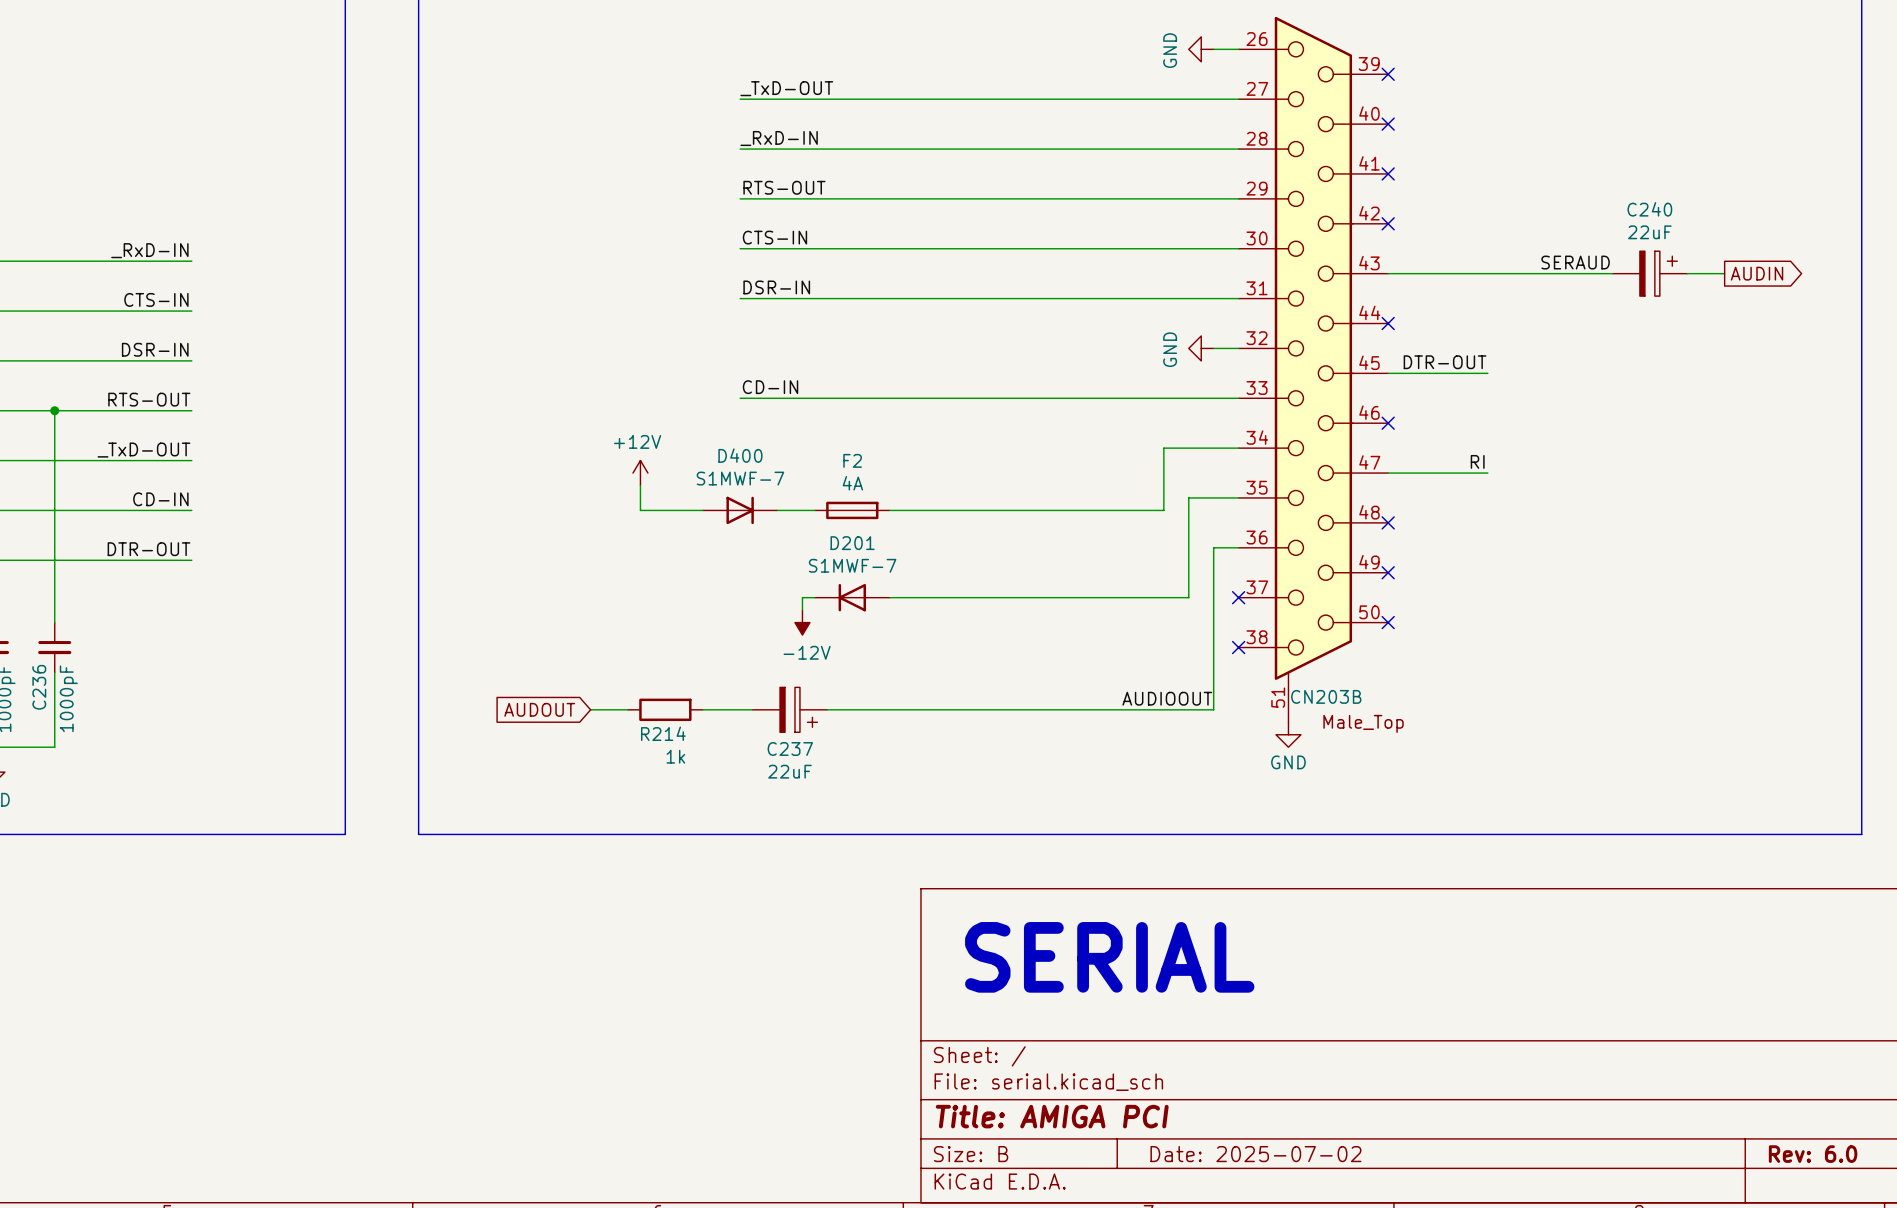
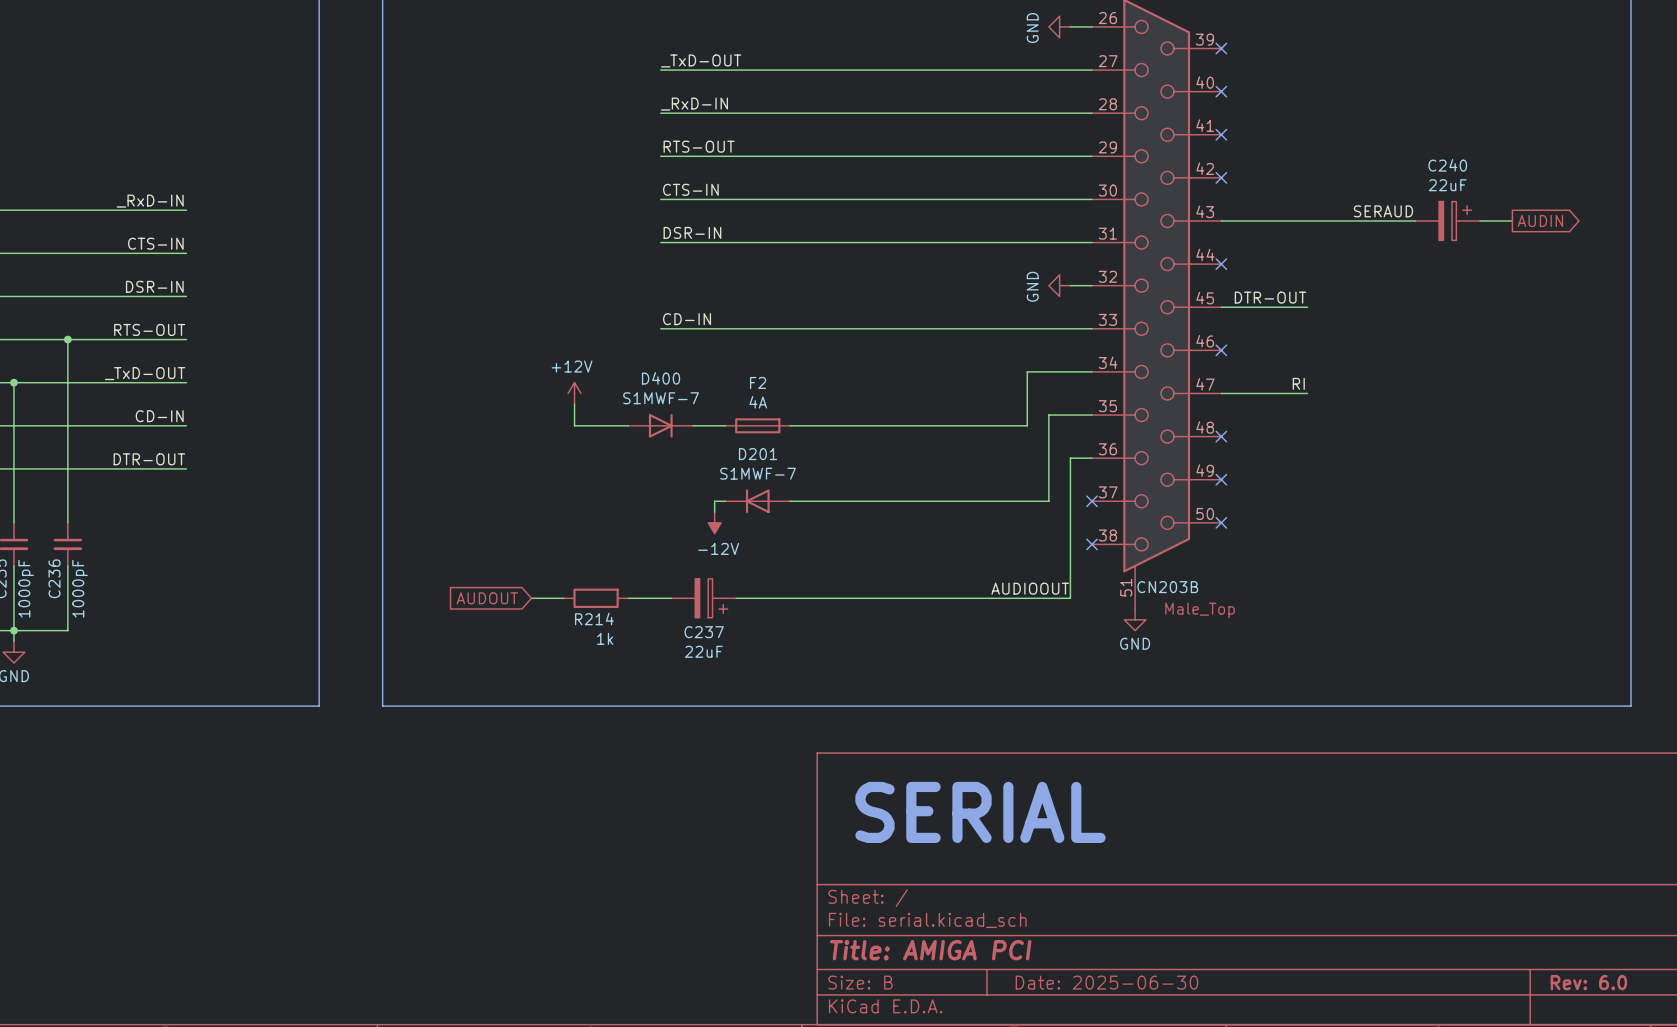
title block: Date: 2025-07-02 (1255, 1154) -> Date: 2025-06-30 (1106, 982)

